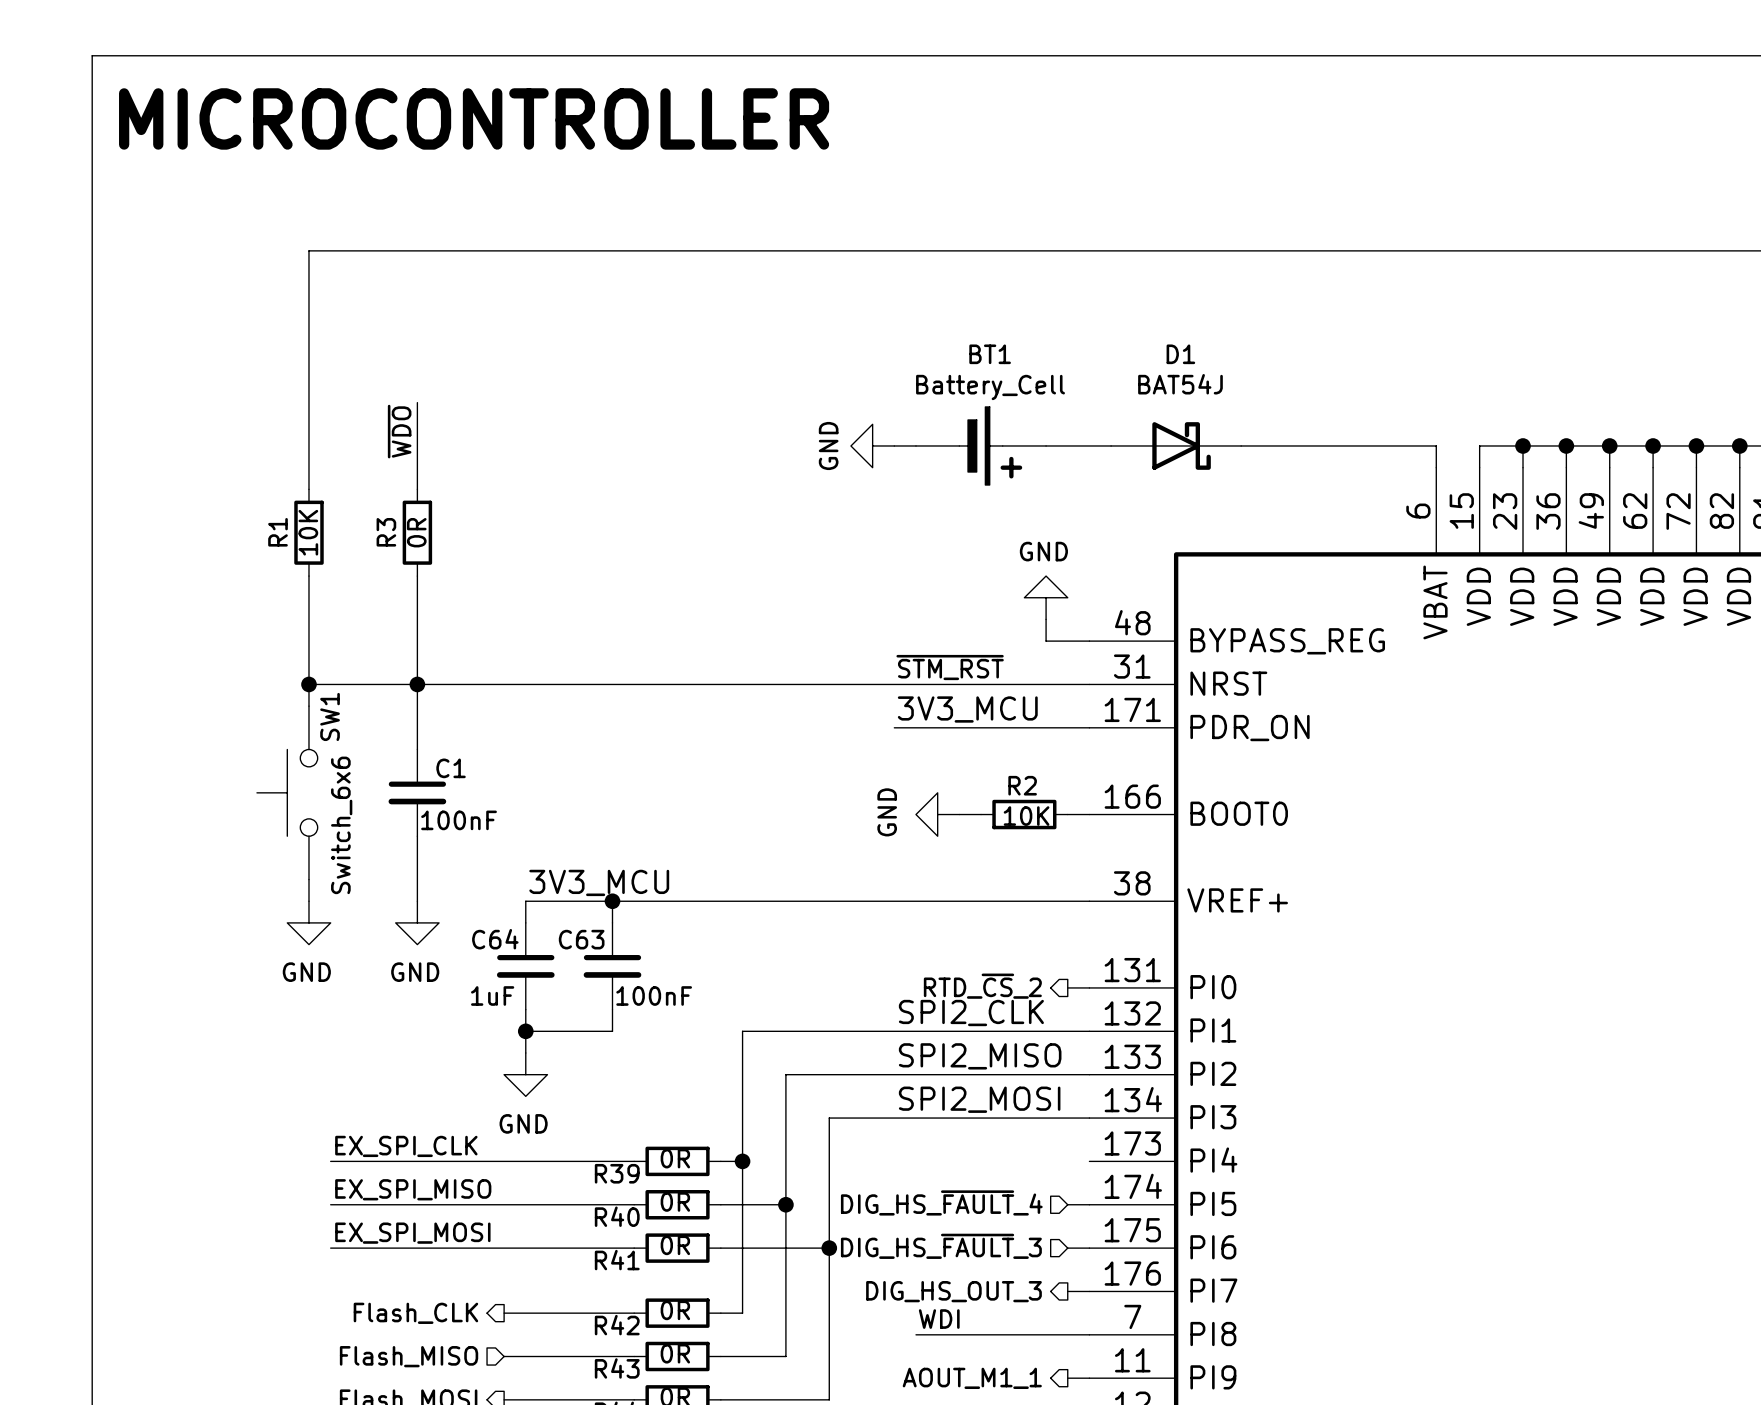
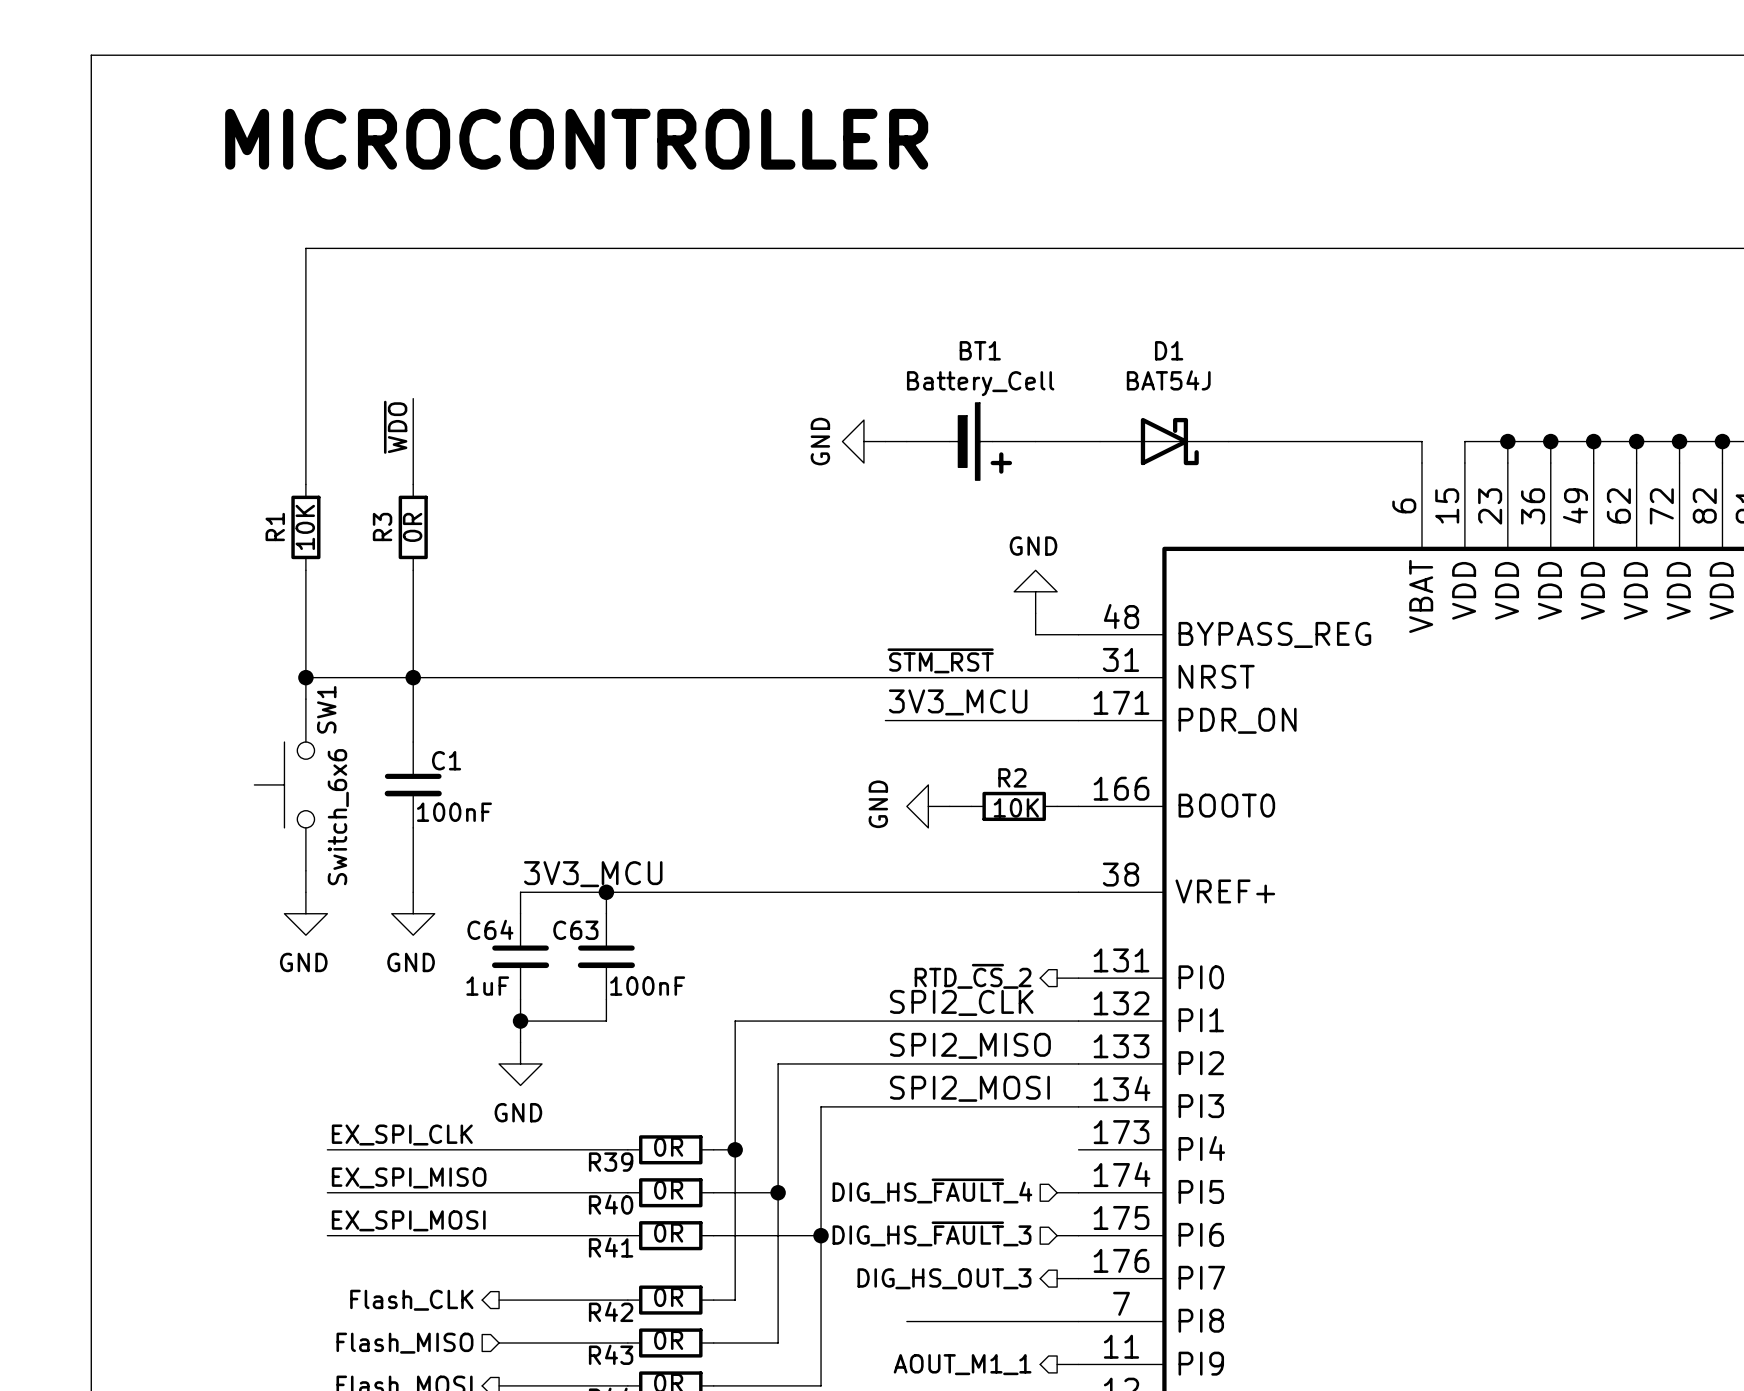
text position: MICROCONTROLLER (474, 118) -> MICROCONTROLLER (576, 139)
label: WDI (939, 1319) -> none

